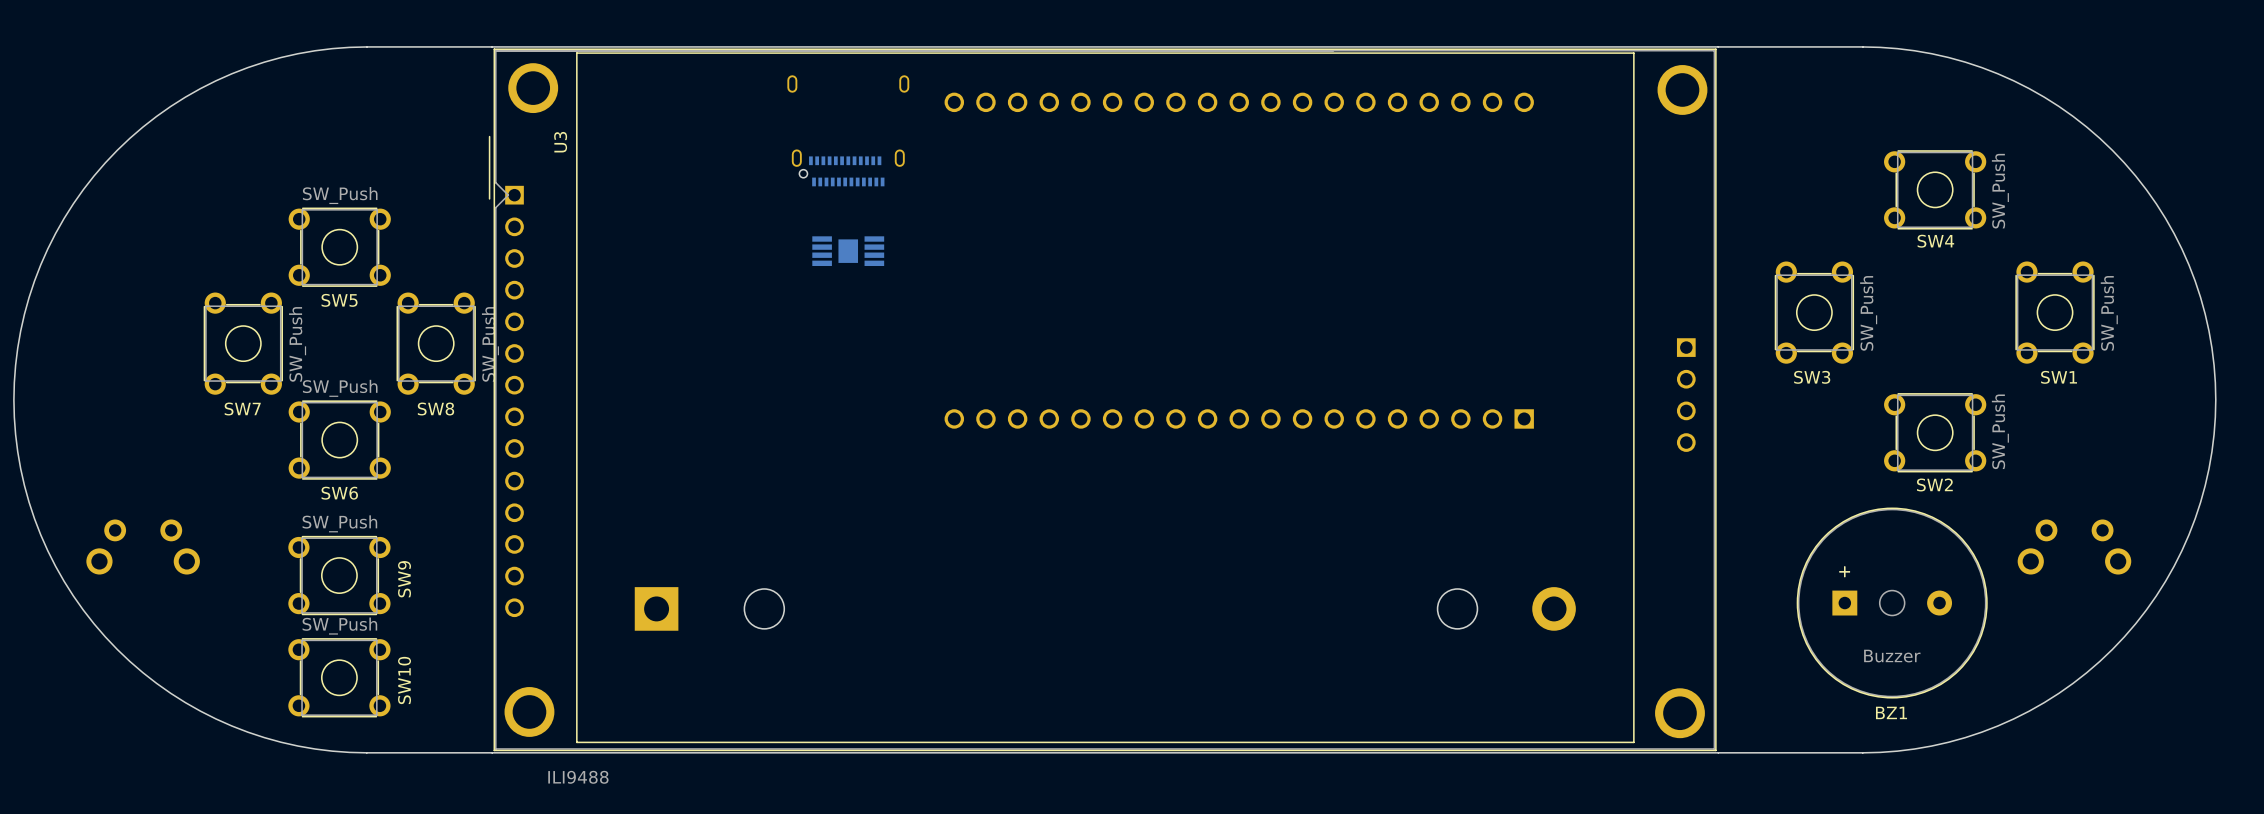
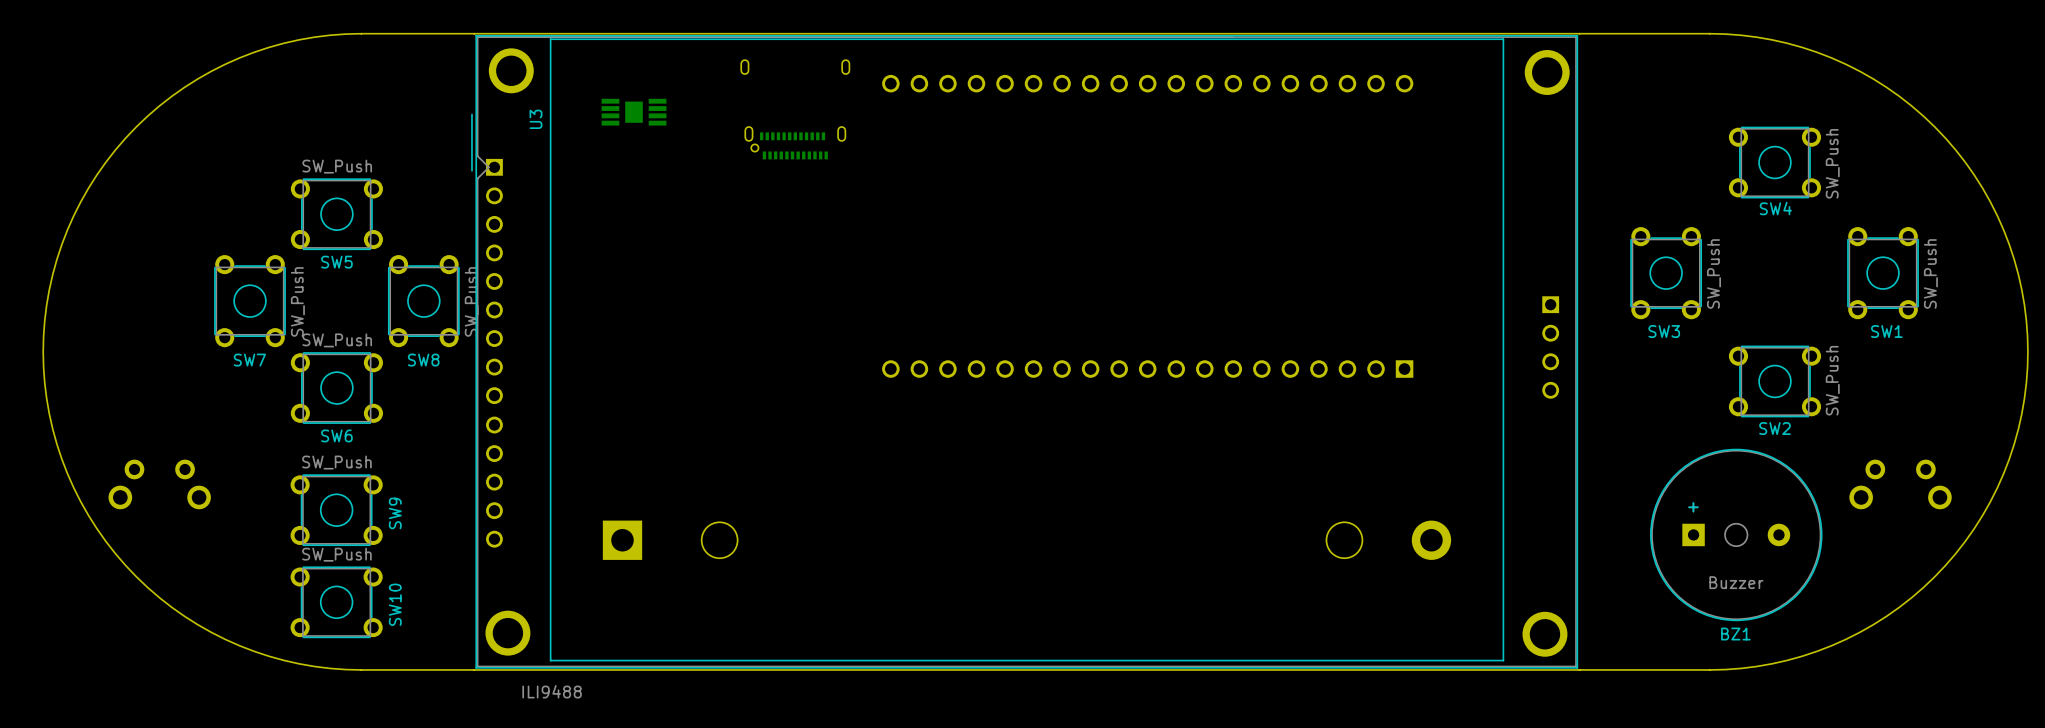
part position: (848, 251) -> (634, 112)

